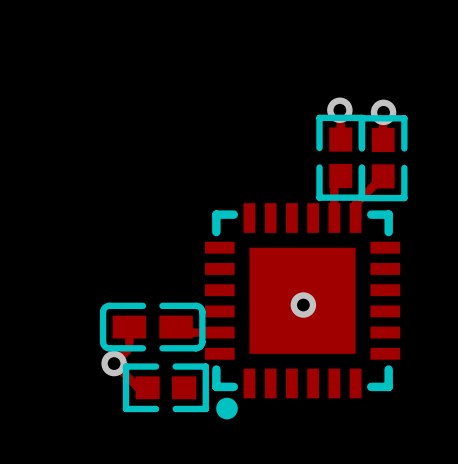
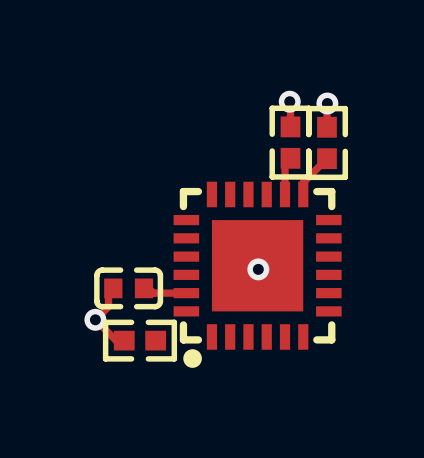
part footprint: [99, 302, 206, 352] -> [94, 267, 164, 310]

